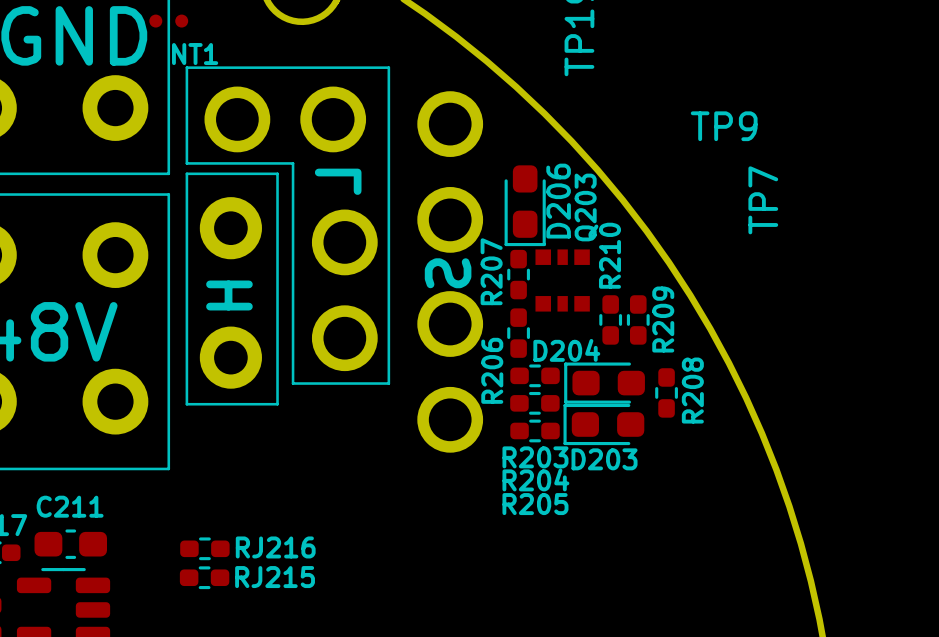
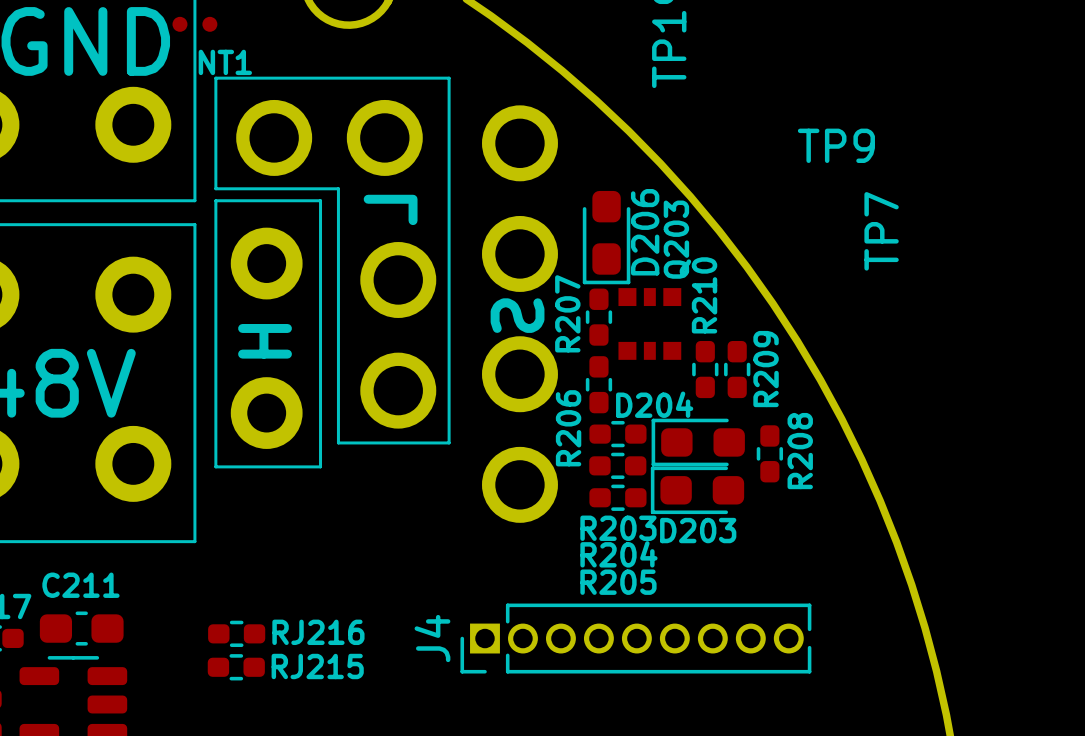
J4: none -> (635, 638)

